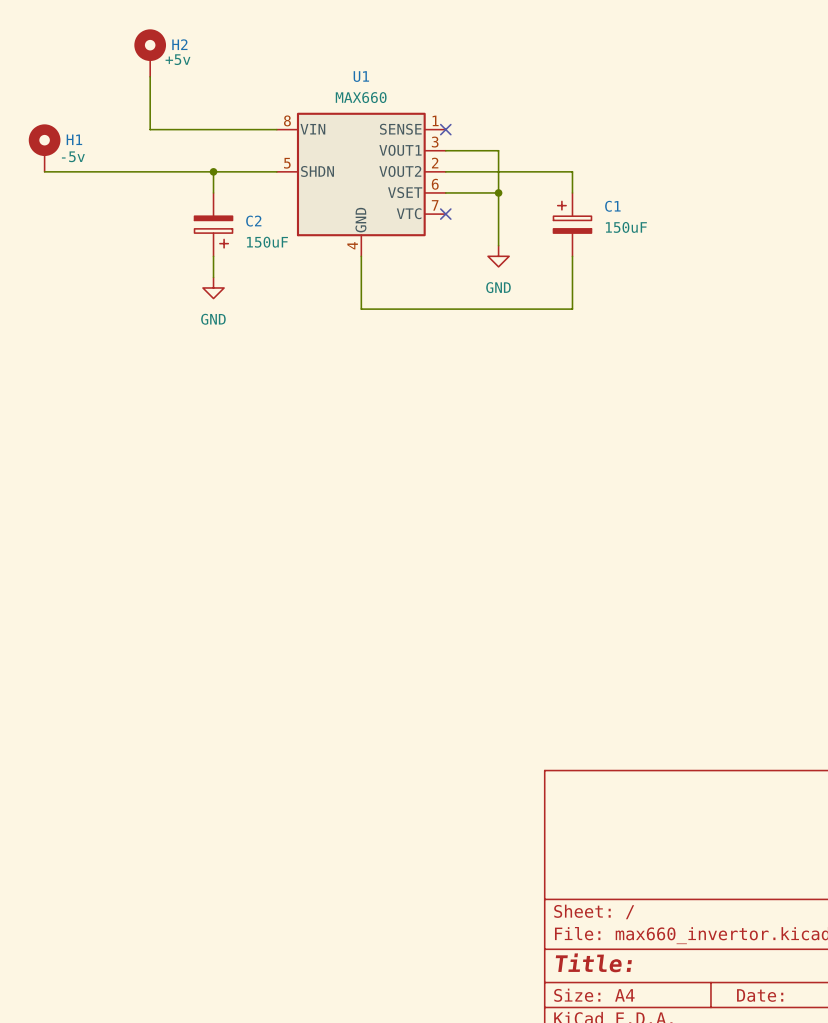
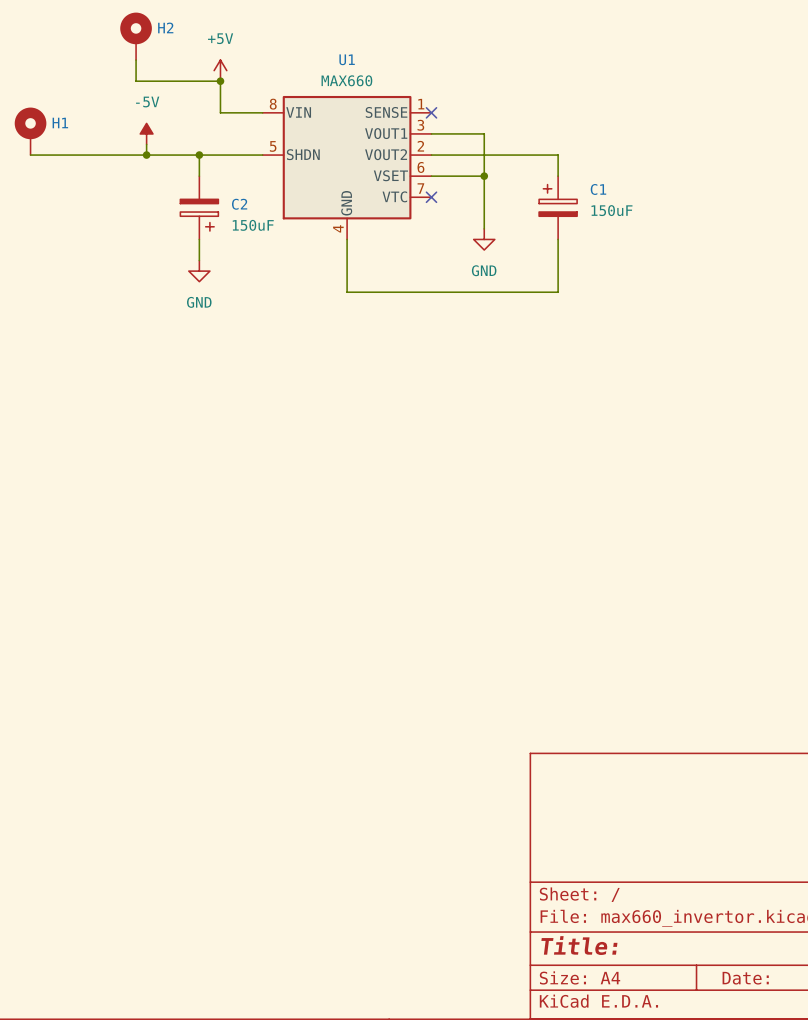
H2 value: +5v (177, 59) -> none
power symbol: none -> +5V (220, 70)
wire: (150, 97) (150, 129) (234, 129) -> (136, 81) (220, 81) (220, 112)
junction: none -> (220, 81)
power symbol: none -> -5V (146, 133)
H1 value: -5v (73, 156) -> none
wire: none -> (146, 144) (146, 155)
junction: none -> (146, 155)

